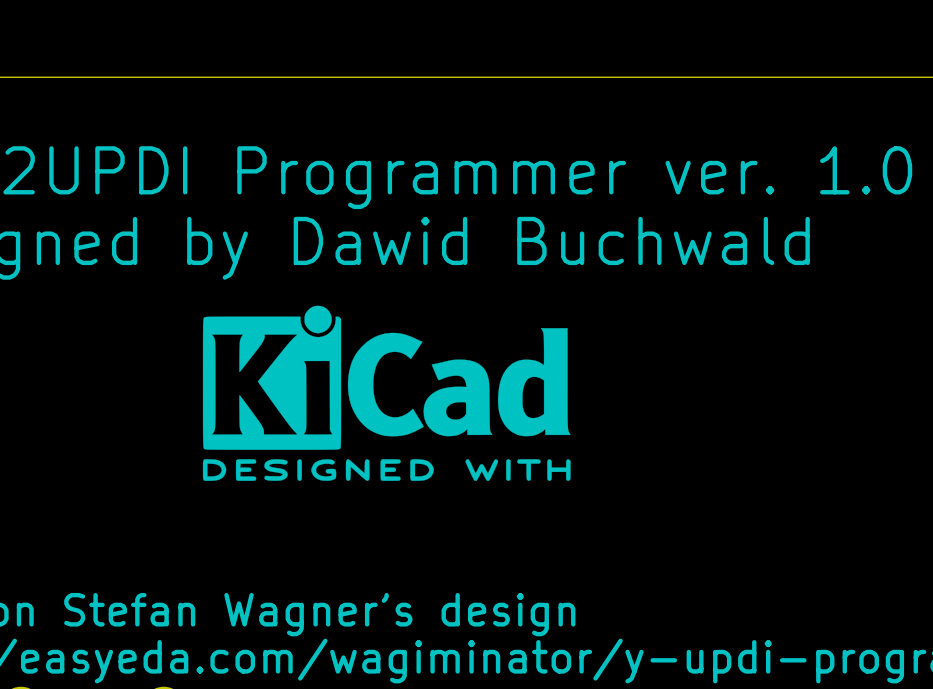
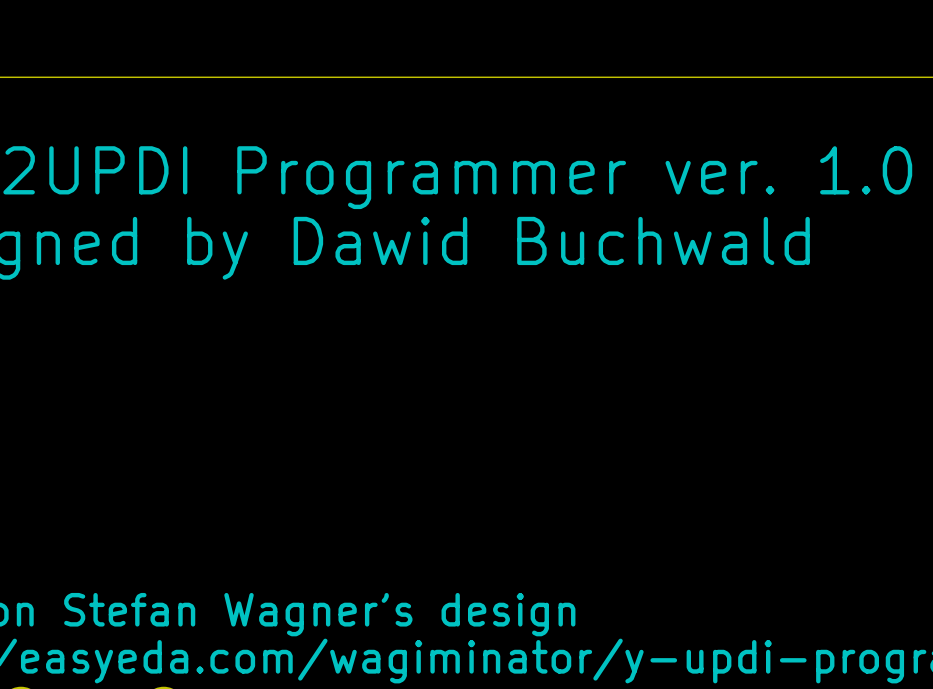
drawing: [202, 305, 571, 481] -> none

